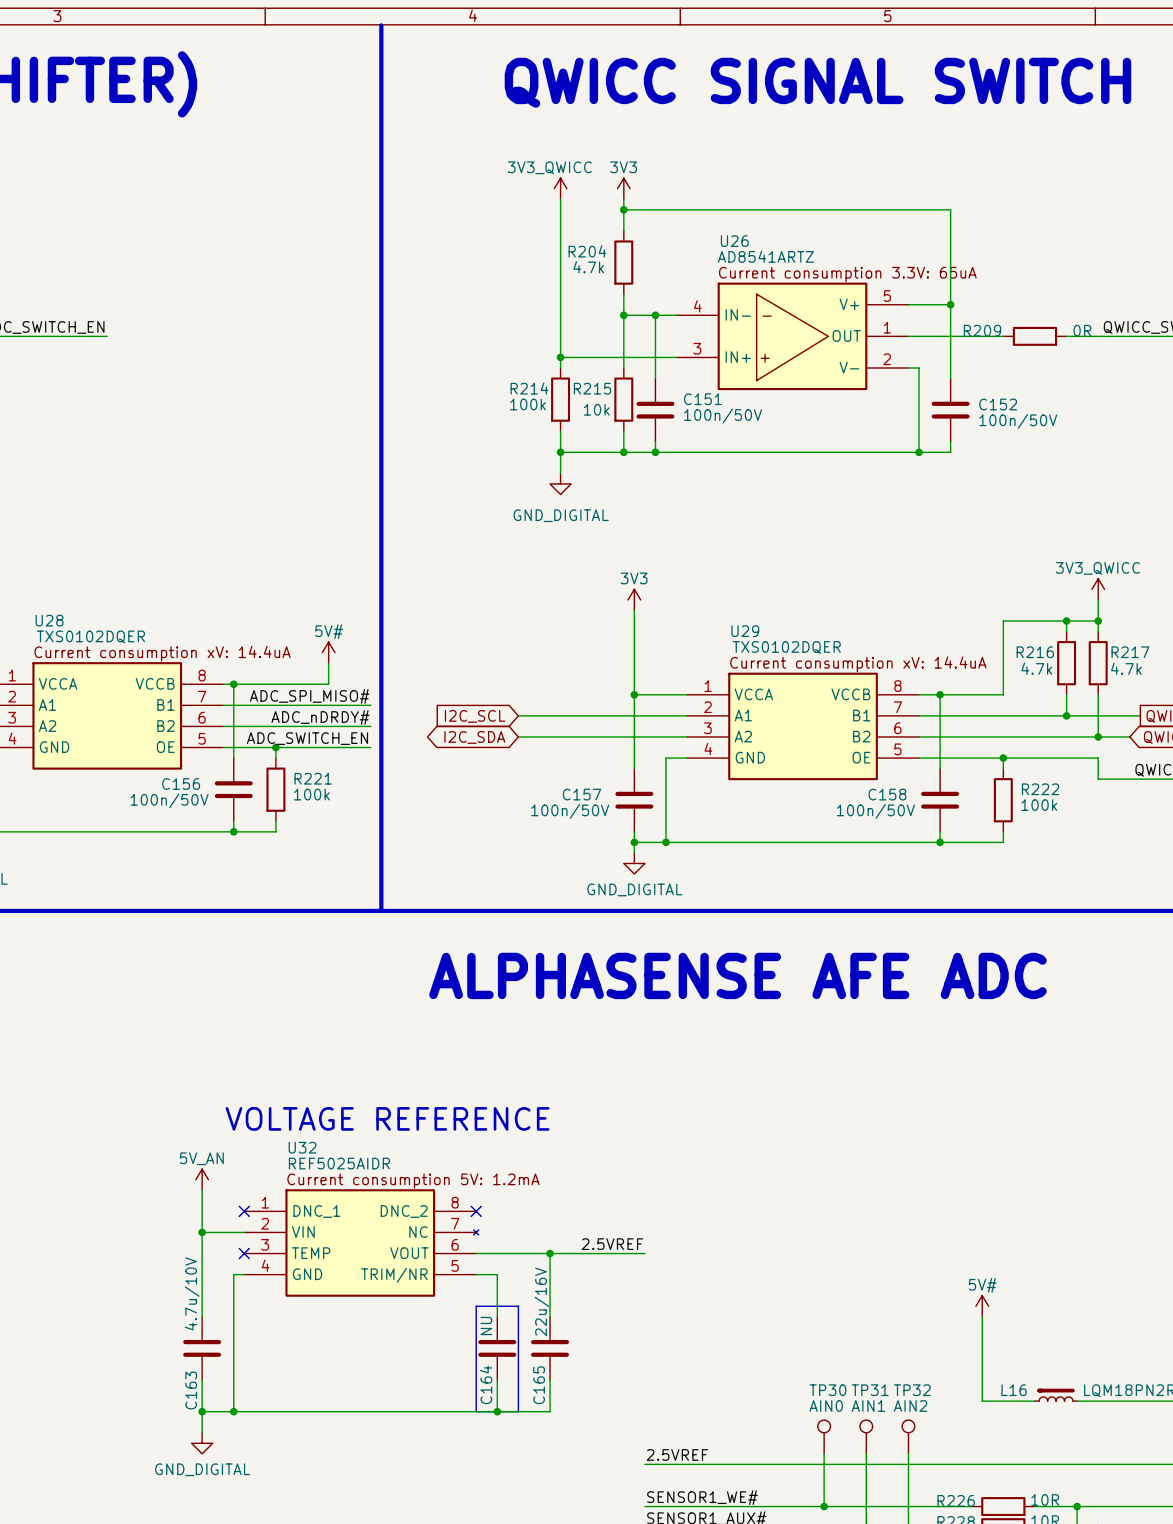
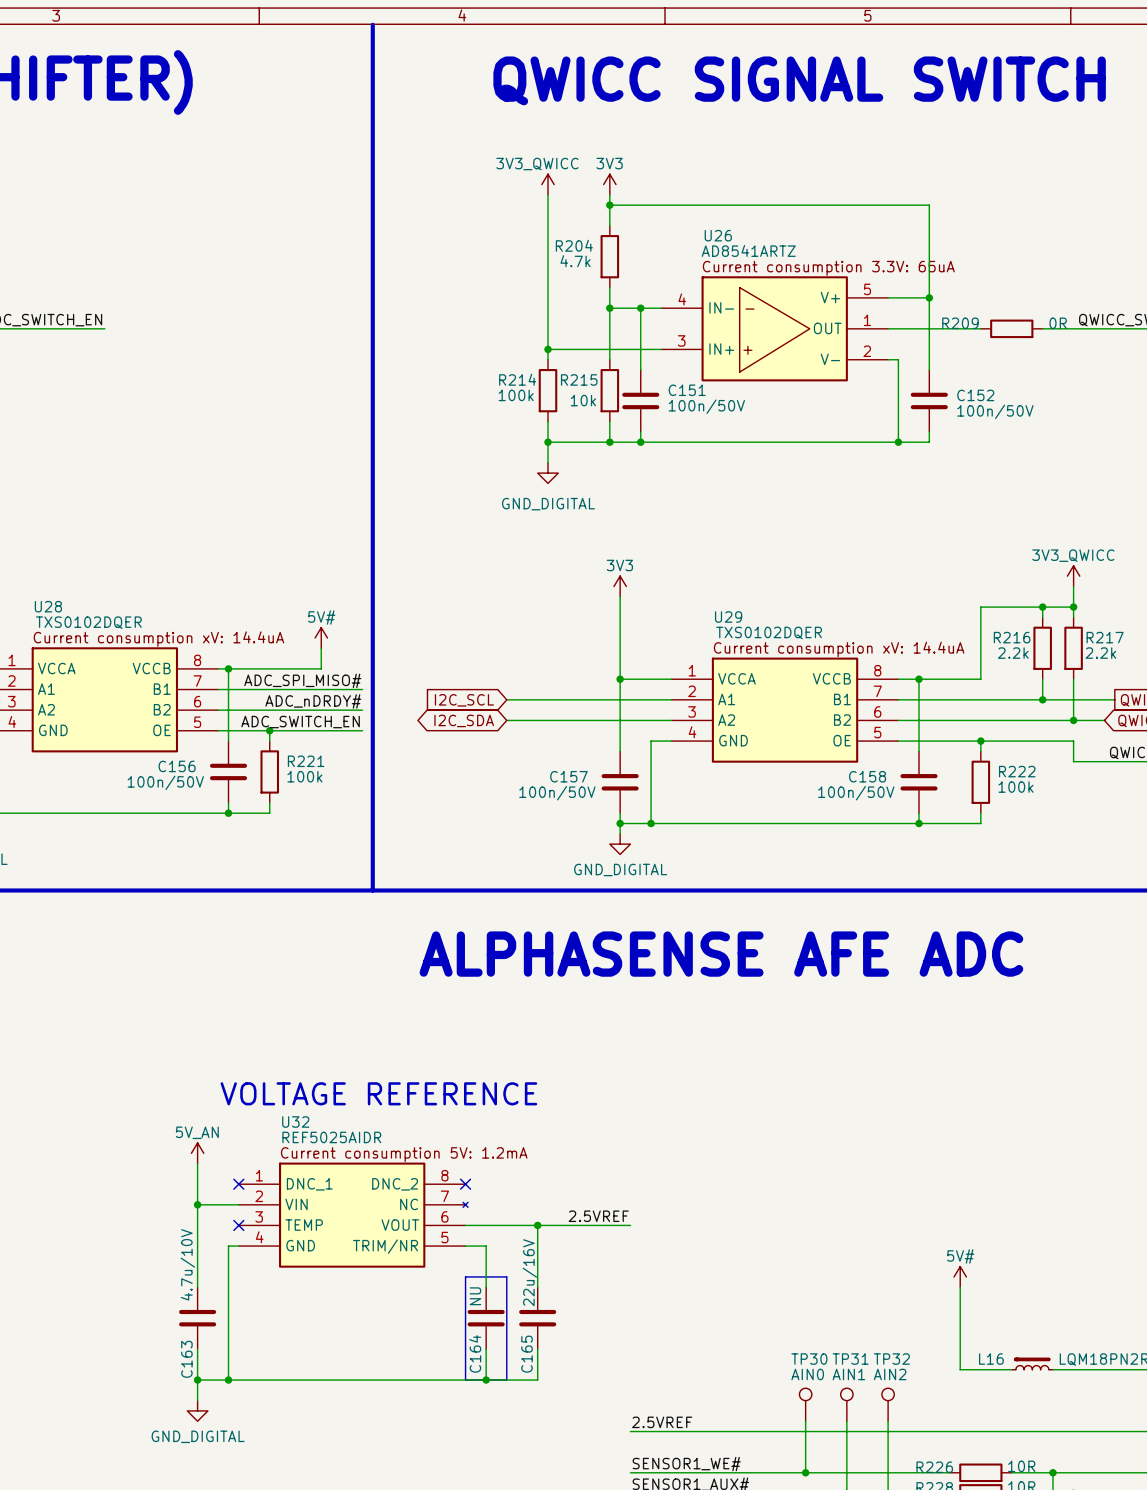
R216 value: 4.7k (1036, 668) -> 2.2k (1013, 653)
R217 value: 4.7k (1126, 668) -> 2.2k (1100, 653)

